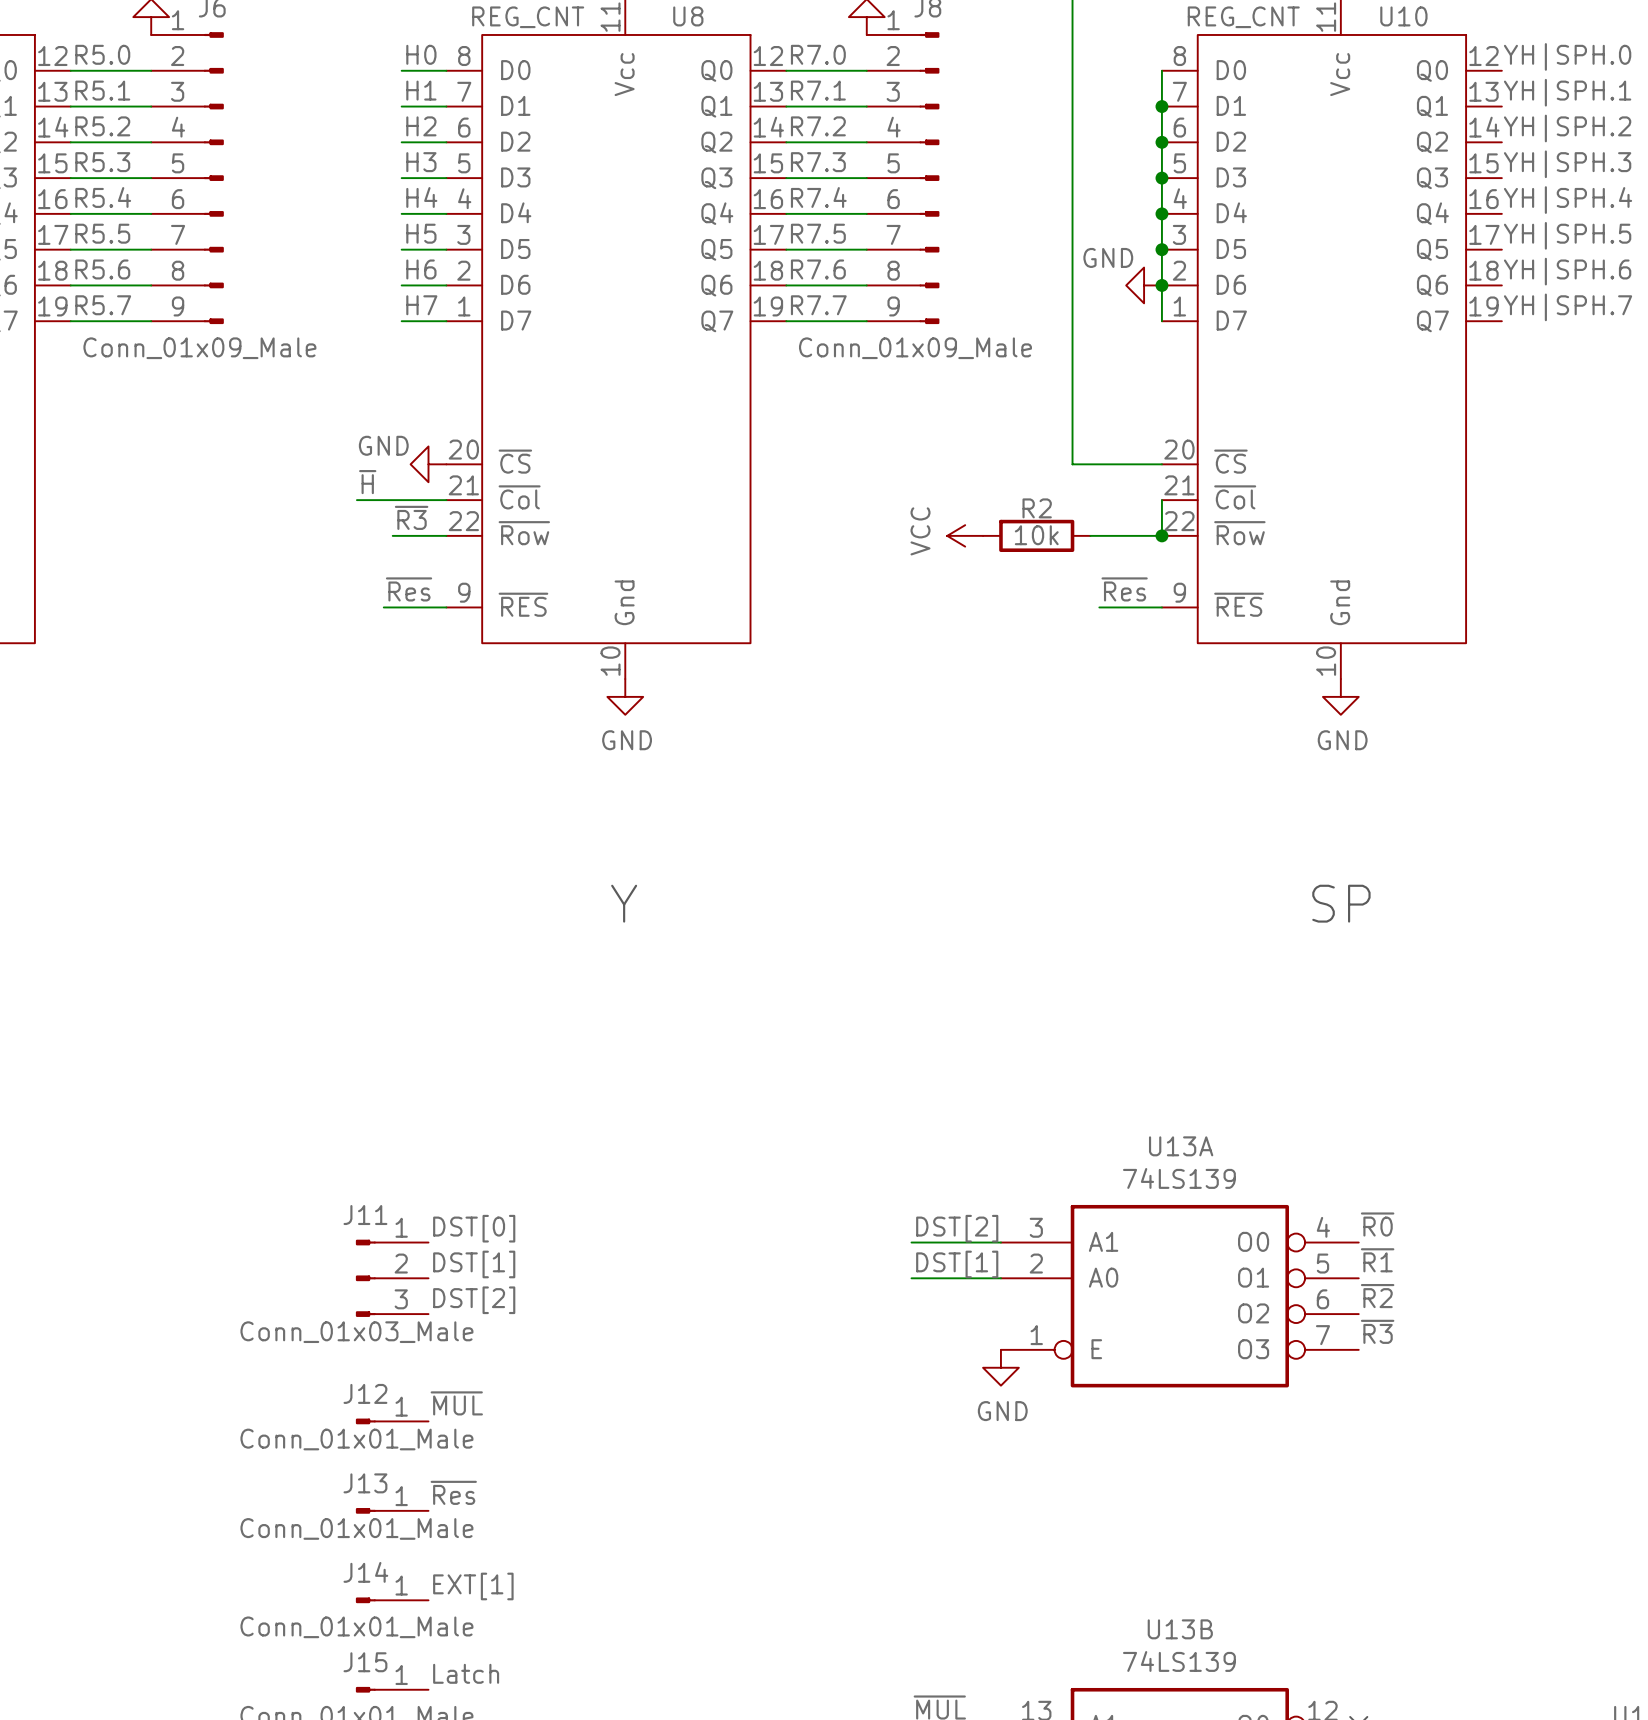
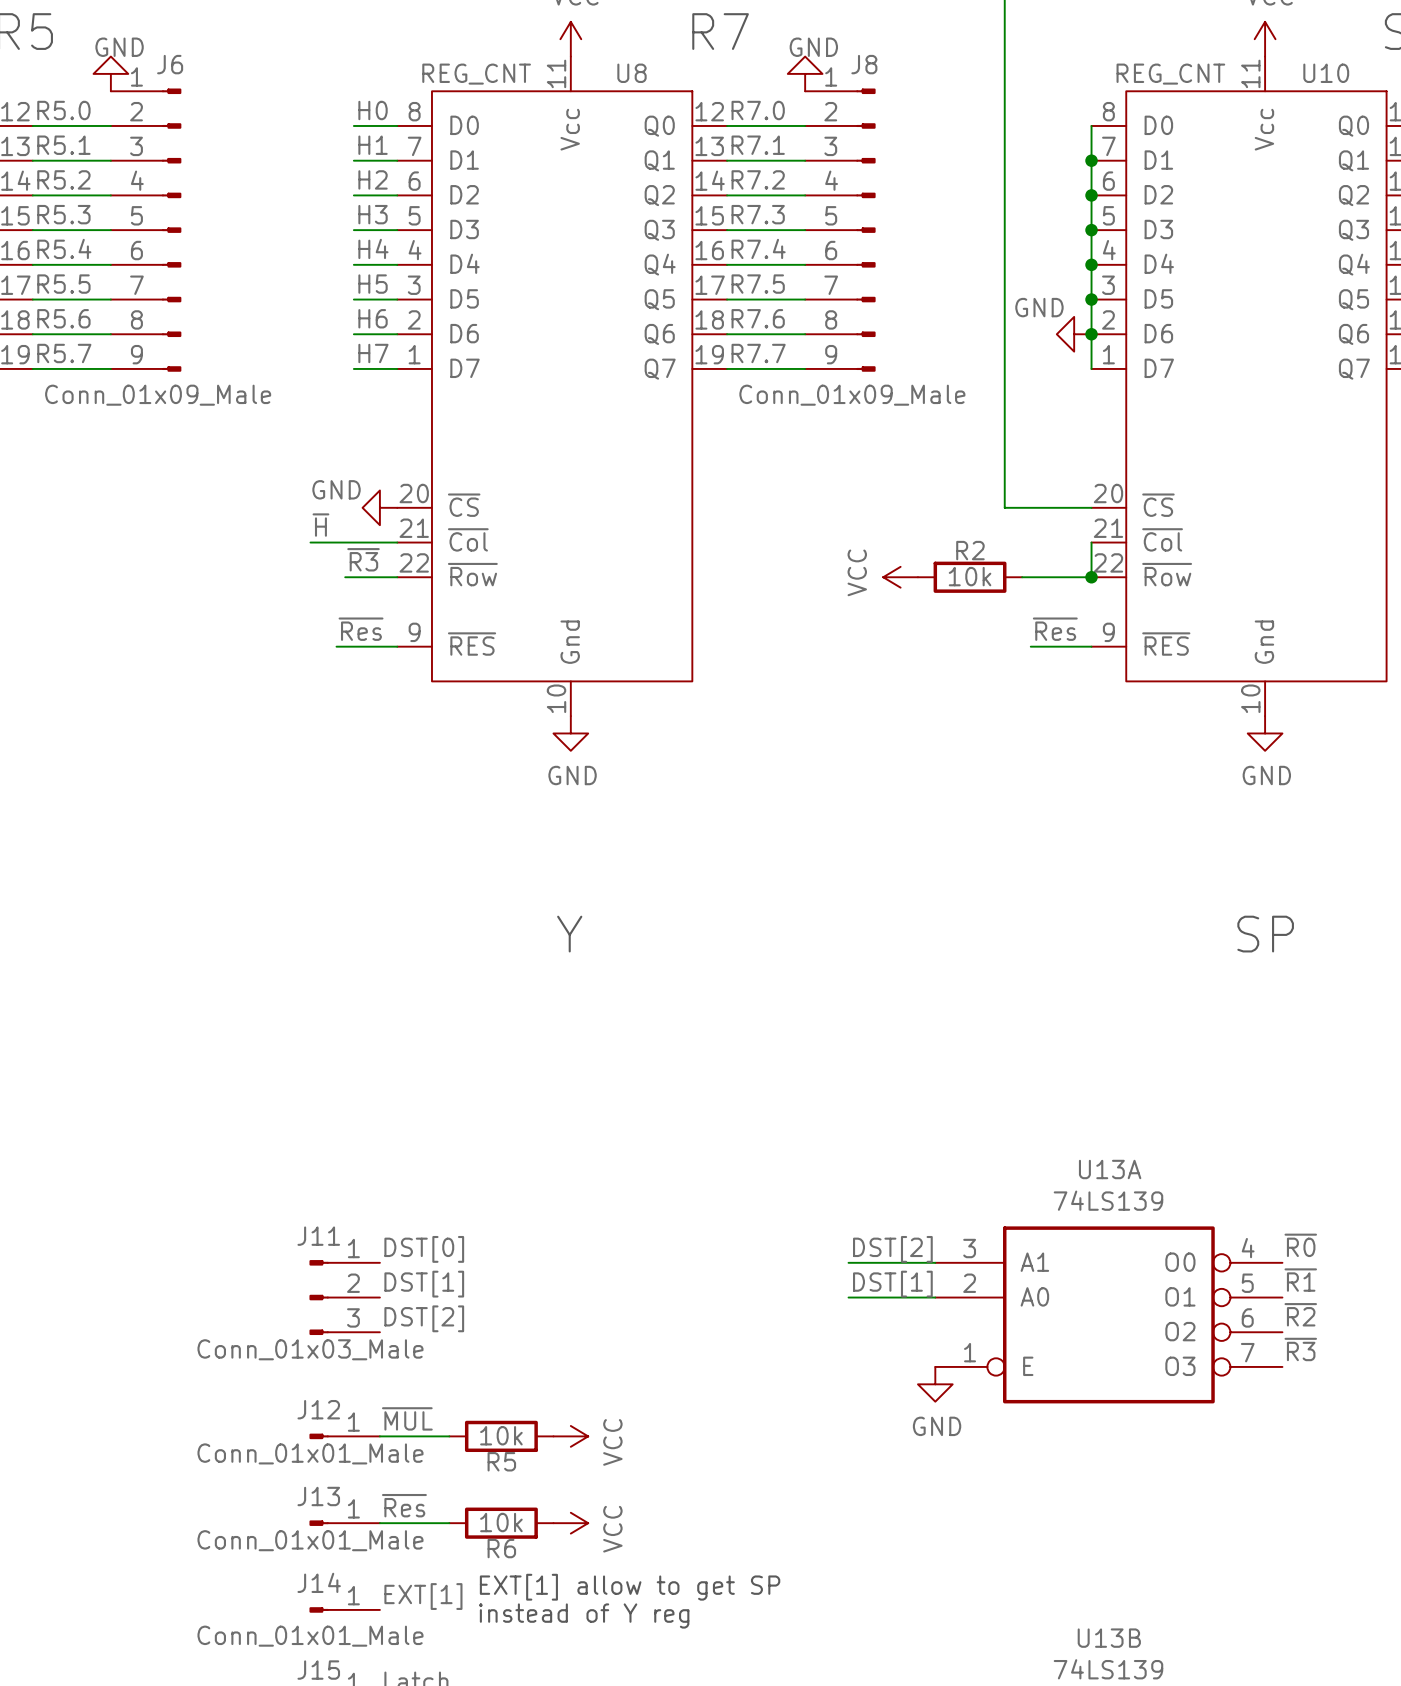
wire: none -> (379, 1436) (449, 1436)
R5: none -> 10k (501, 1436)
power symbol: none -> VCC (570, 1436)
wire: none -> (379, 1523) (449, 1523)
R6: none -> 10k (501, 1523)
power symbol: none -> VCC (570, 1523)
text: none -> EXT[1] allow to get SP (630, 1587)
text: none -> instead of Y reg (584, 1615)

